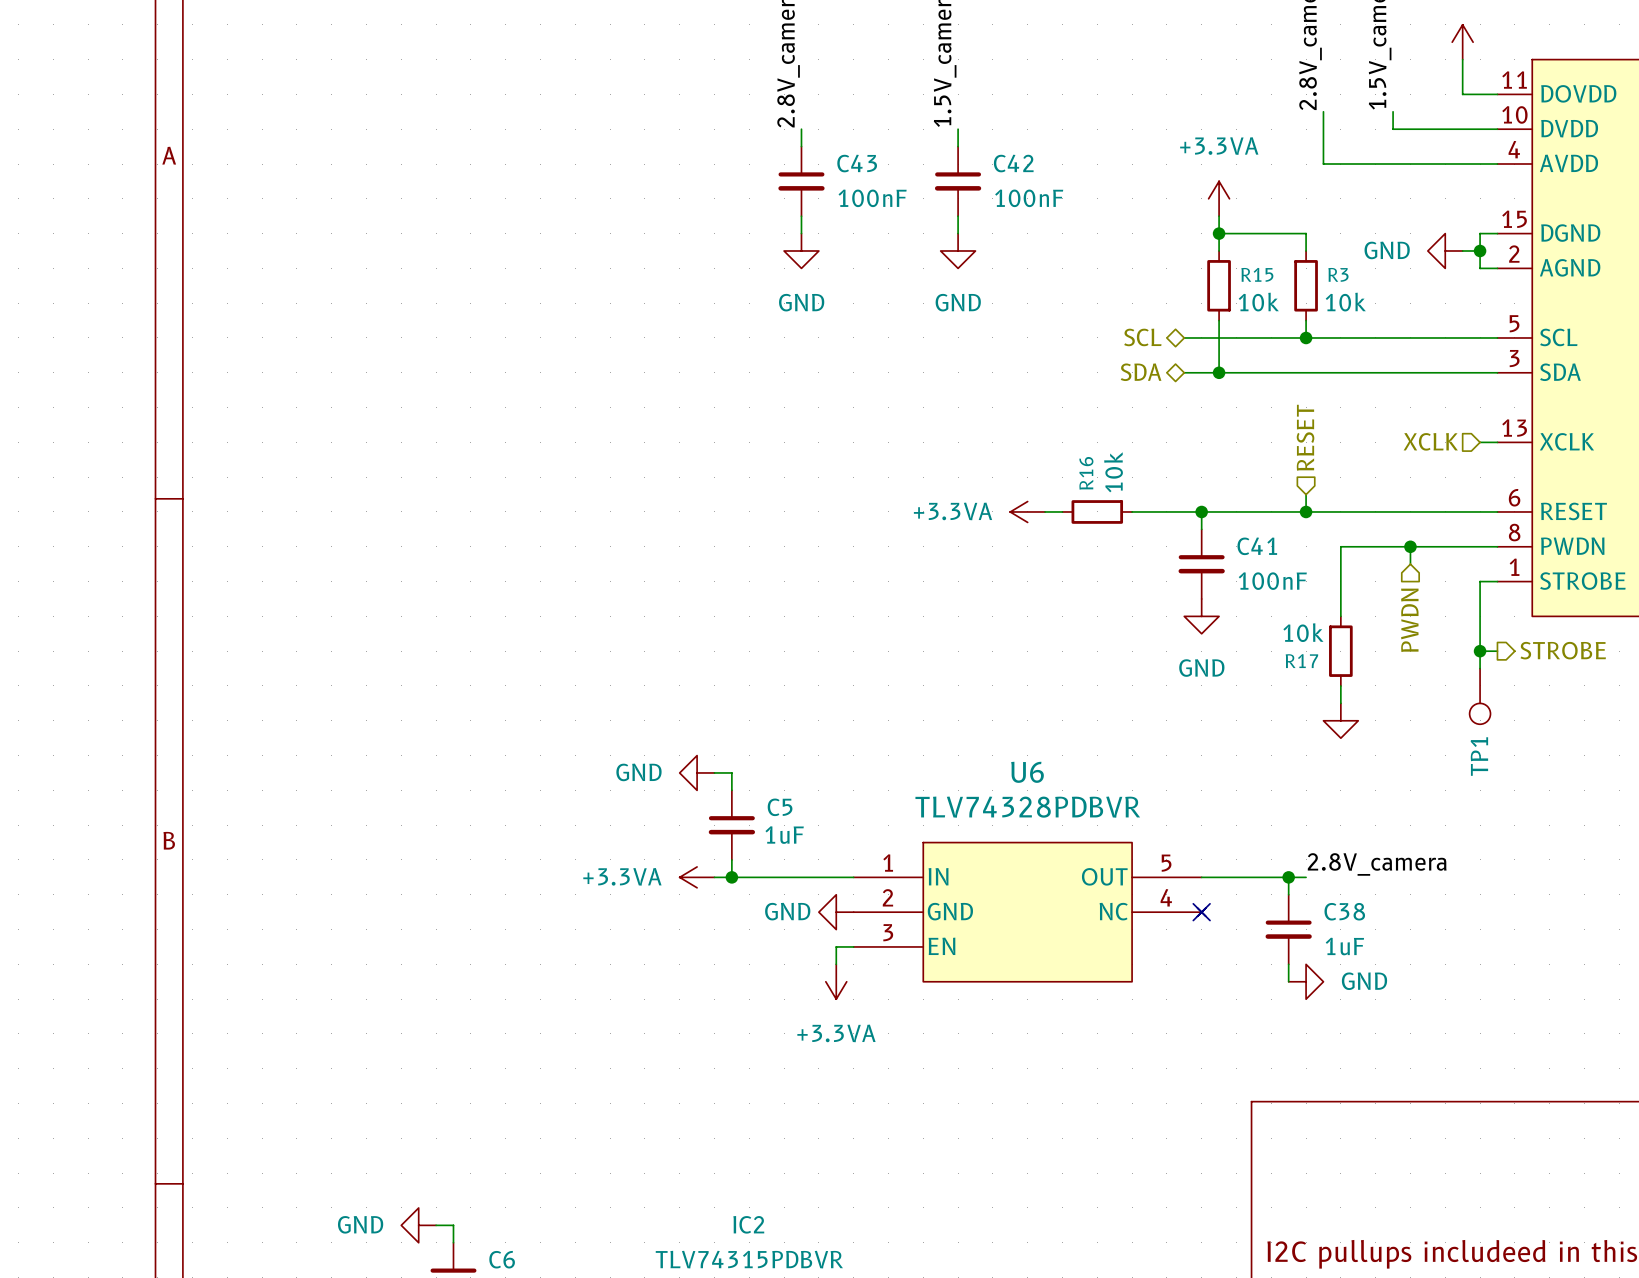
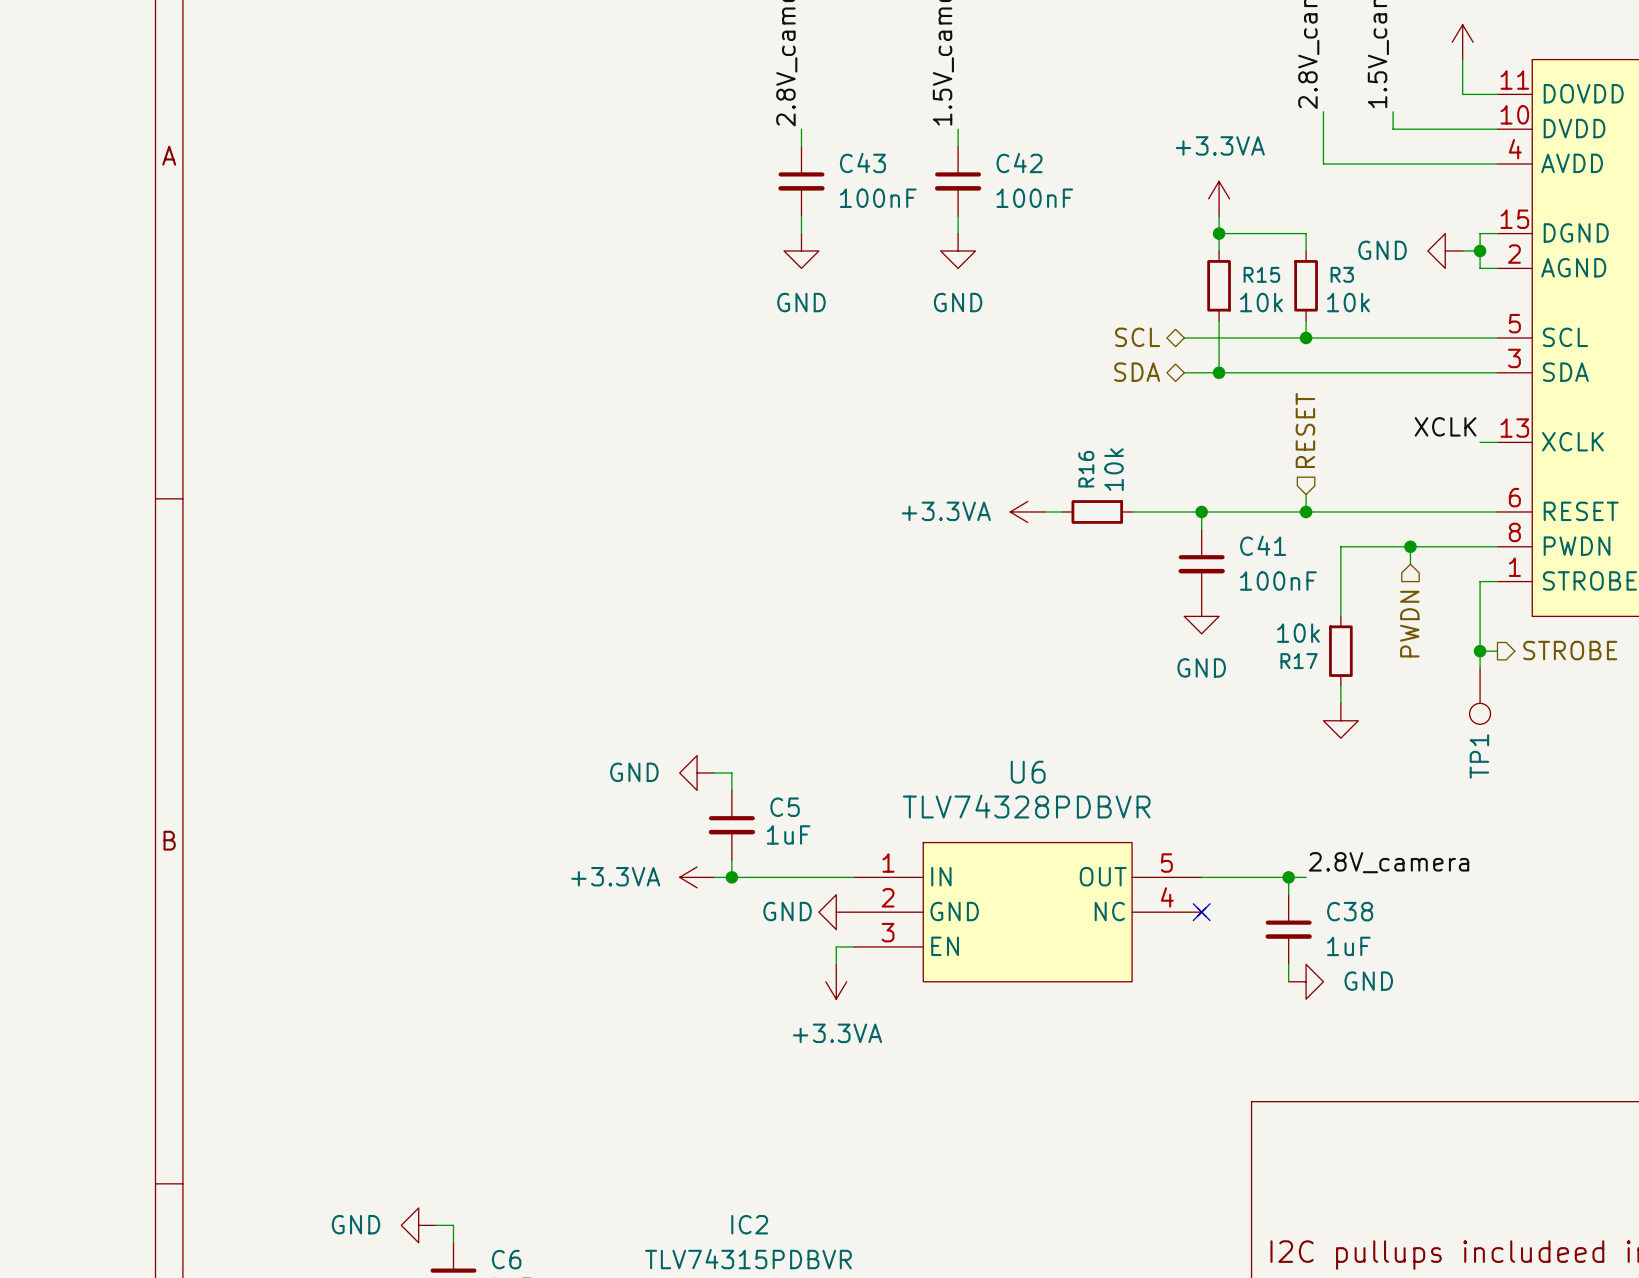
label: none -> XCLK (1445, 426)
hierarchical label: XCLK (1430, 441) -> none

